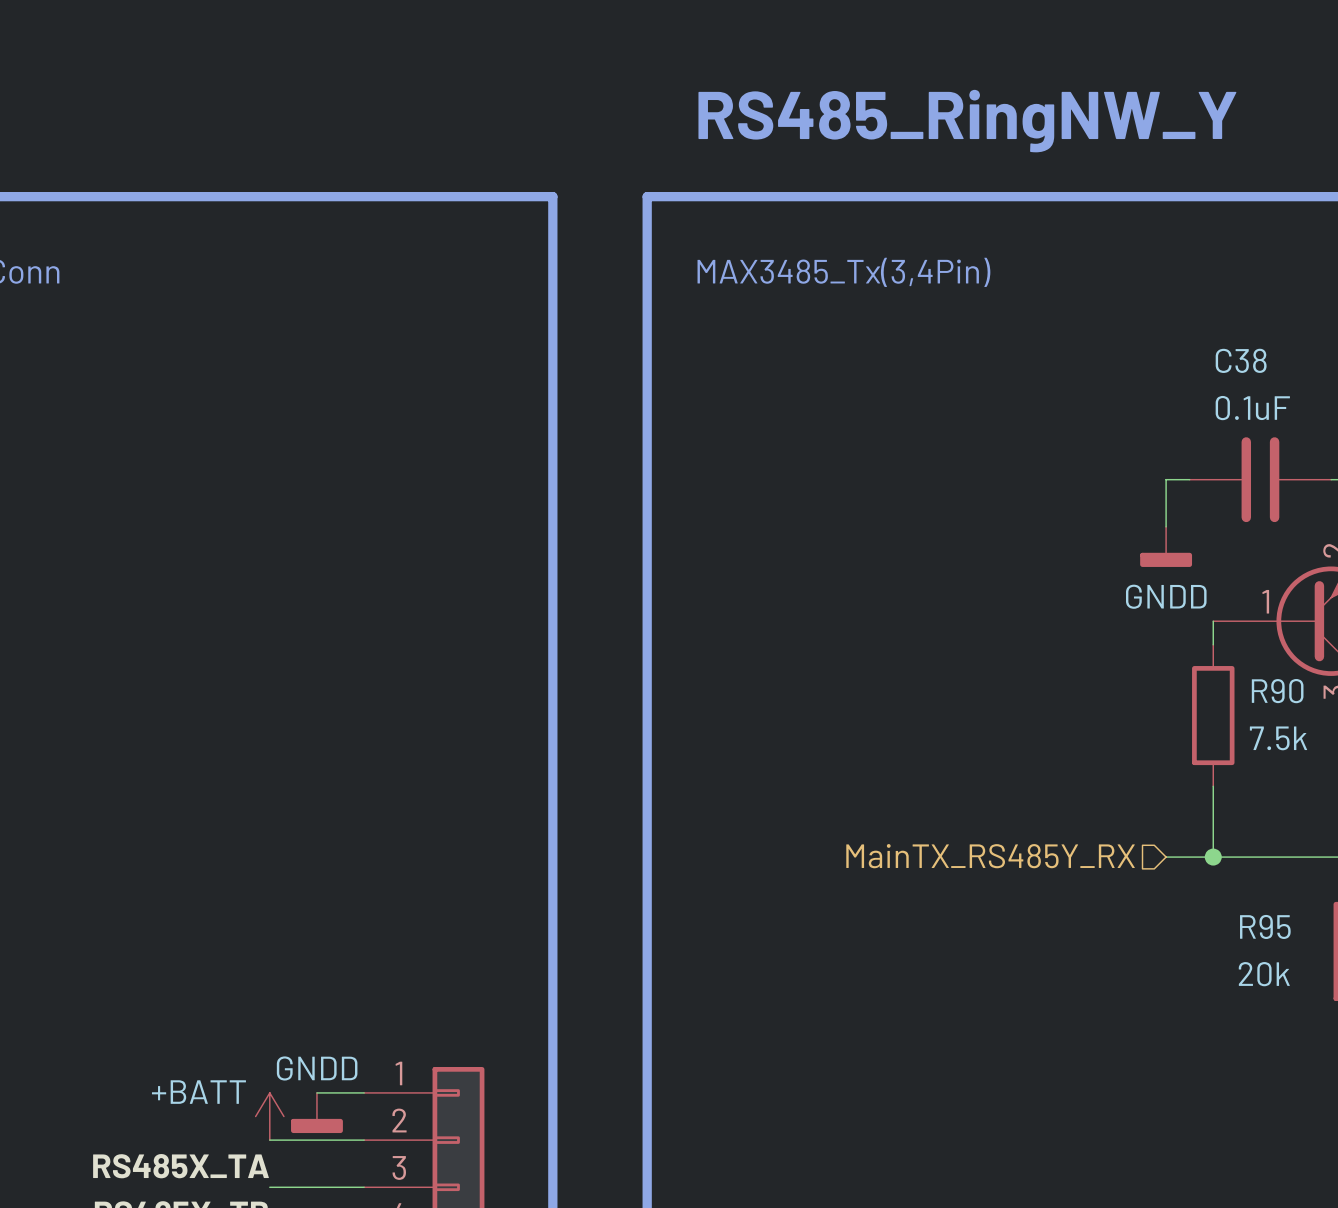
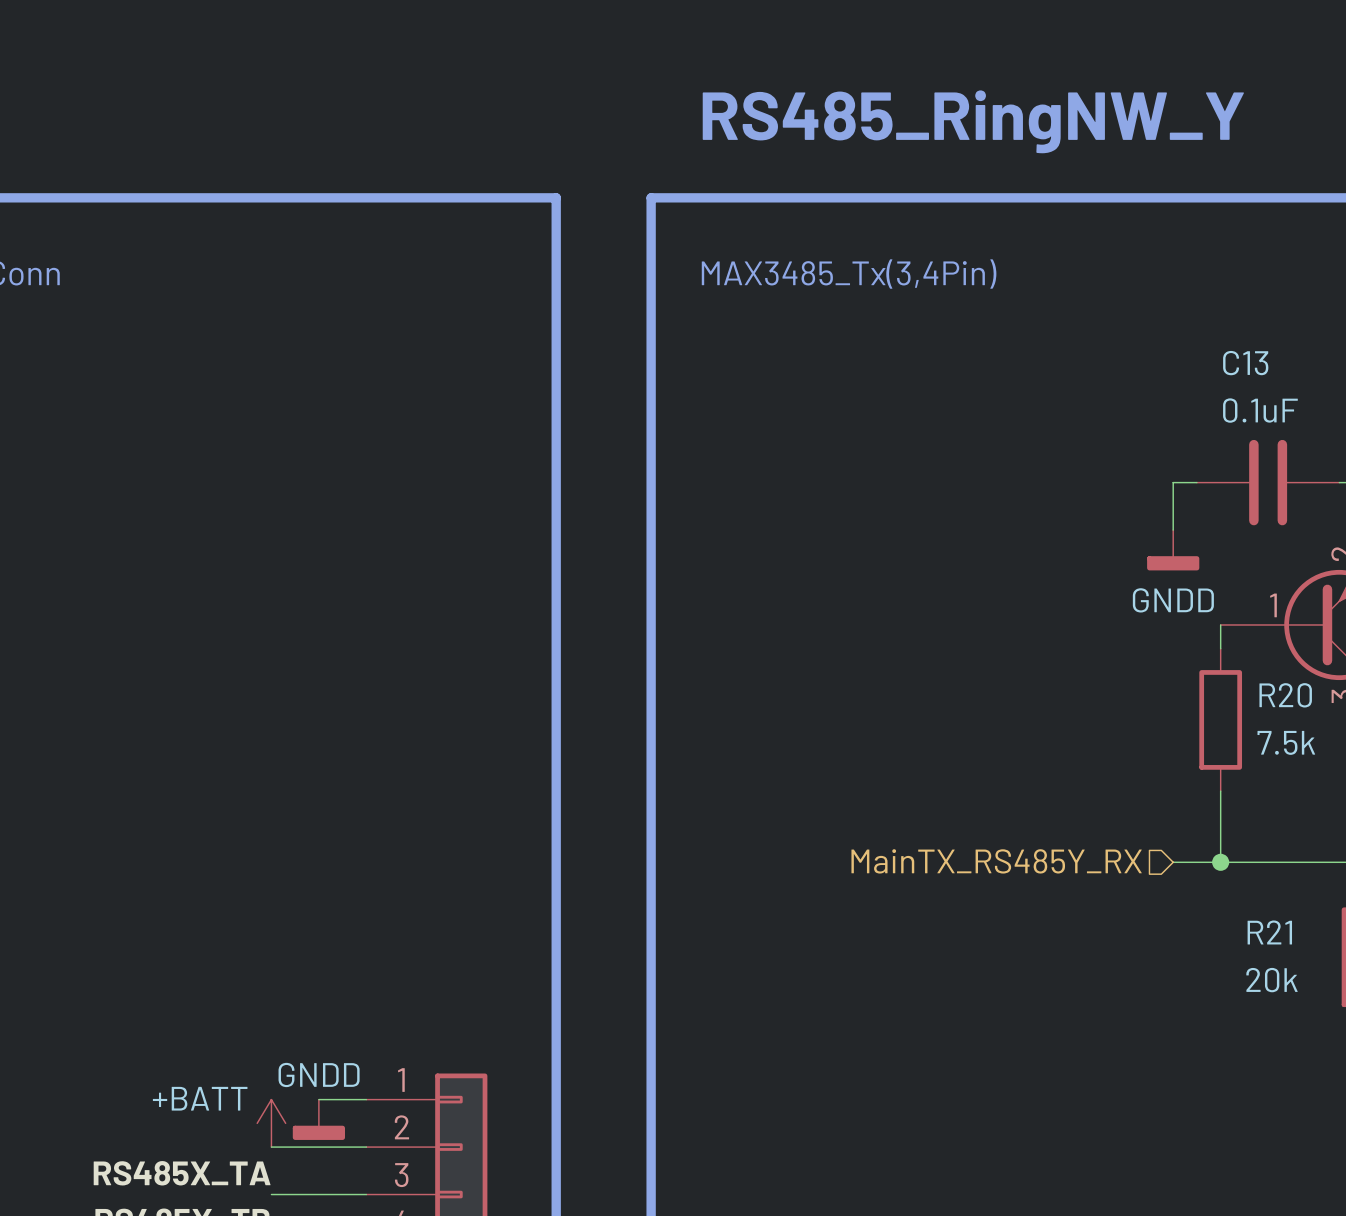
C38 name: C38 (1241, 360) -> C13 (1245, 363)
R90 name: R90 (1277, 691) -> R20 (1285, 695)
R95 name: R95 (1265, 926) -> R21 (1269, 932)

